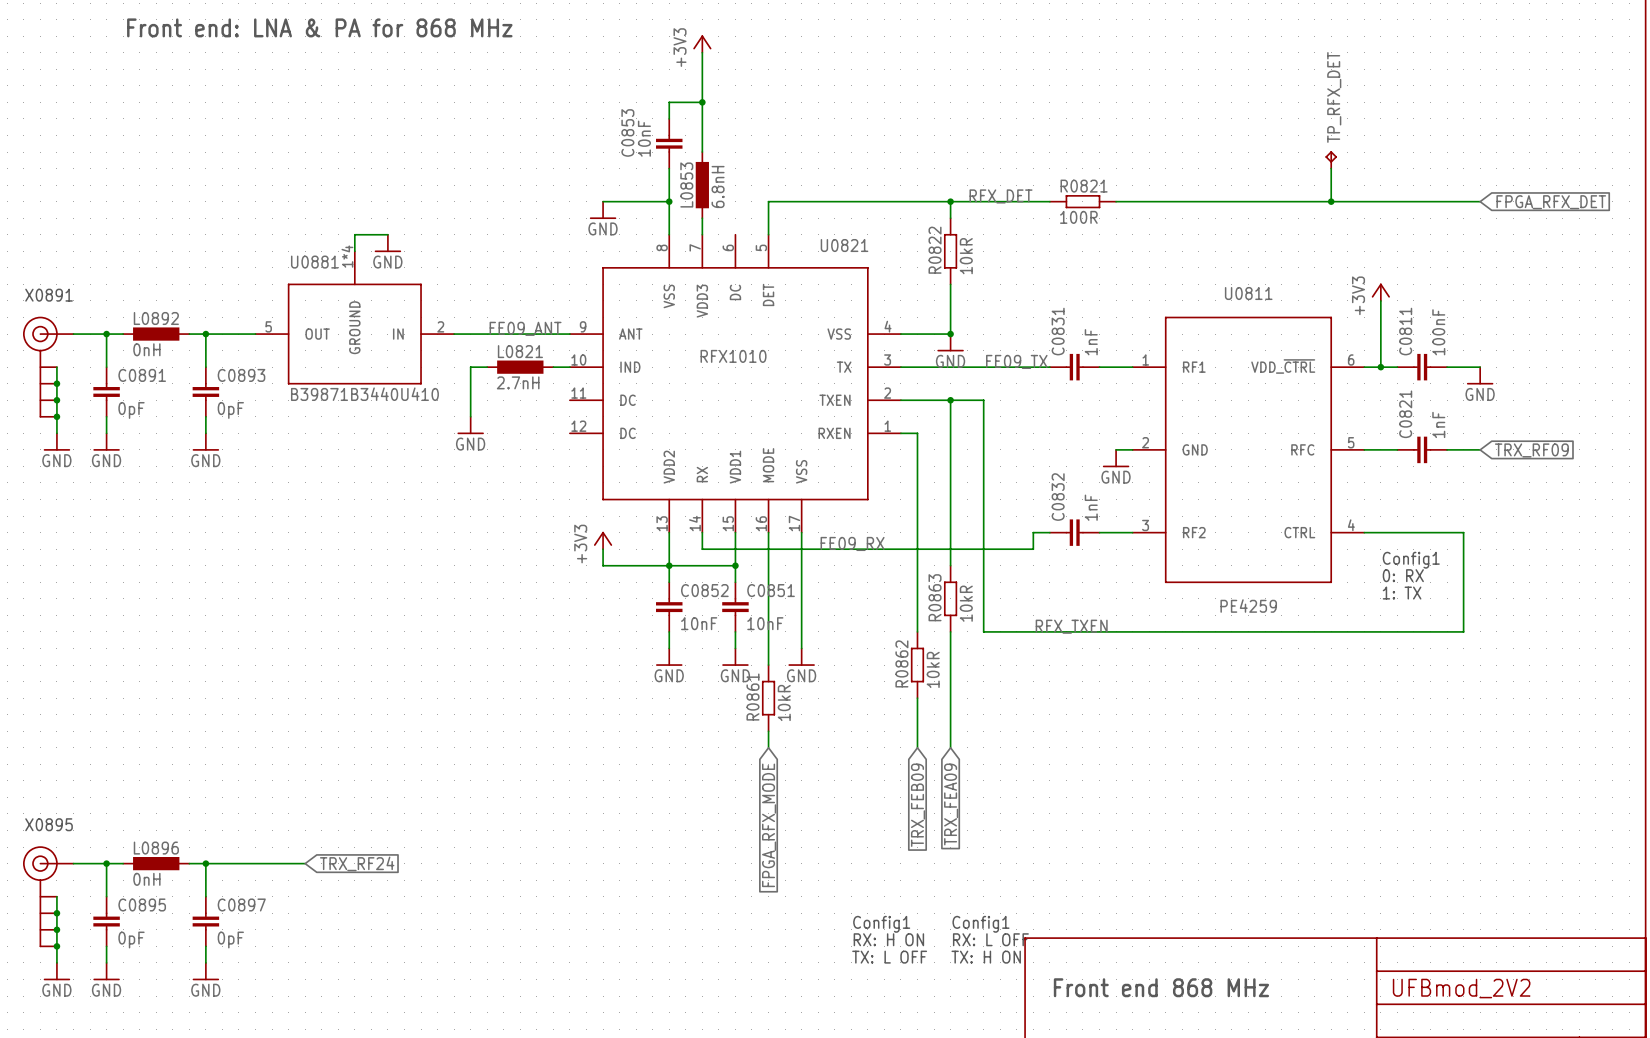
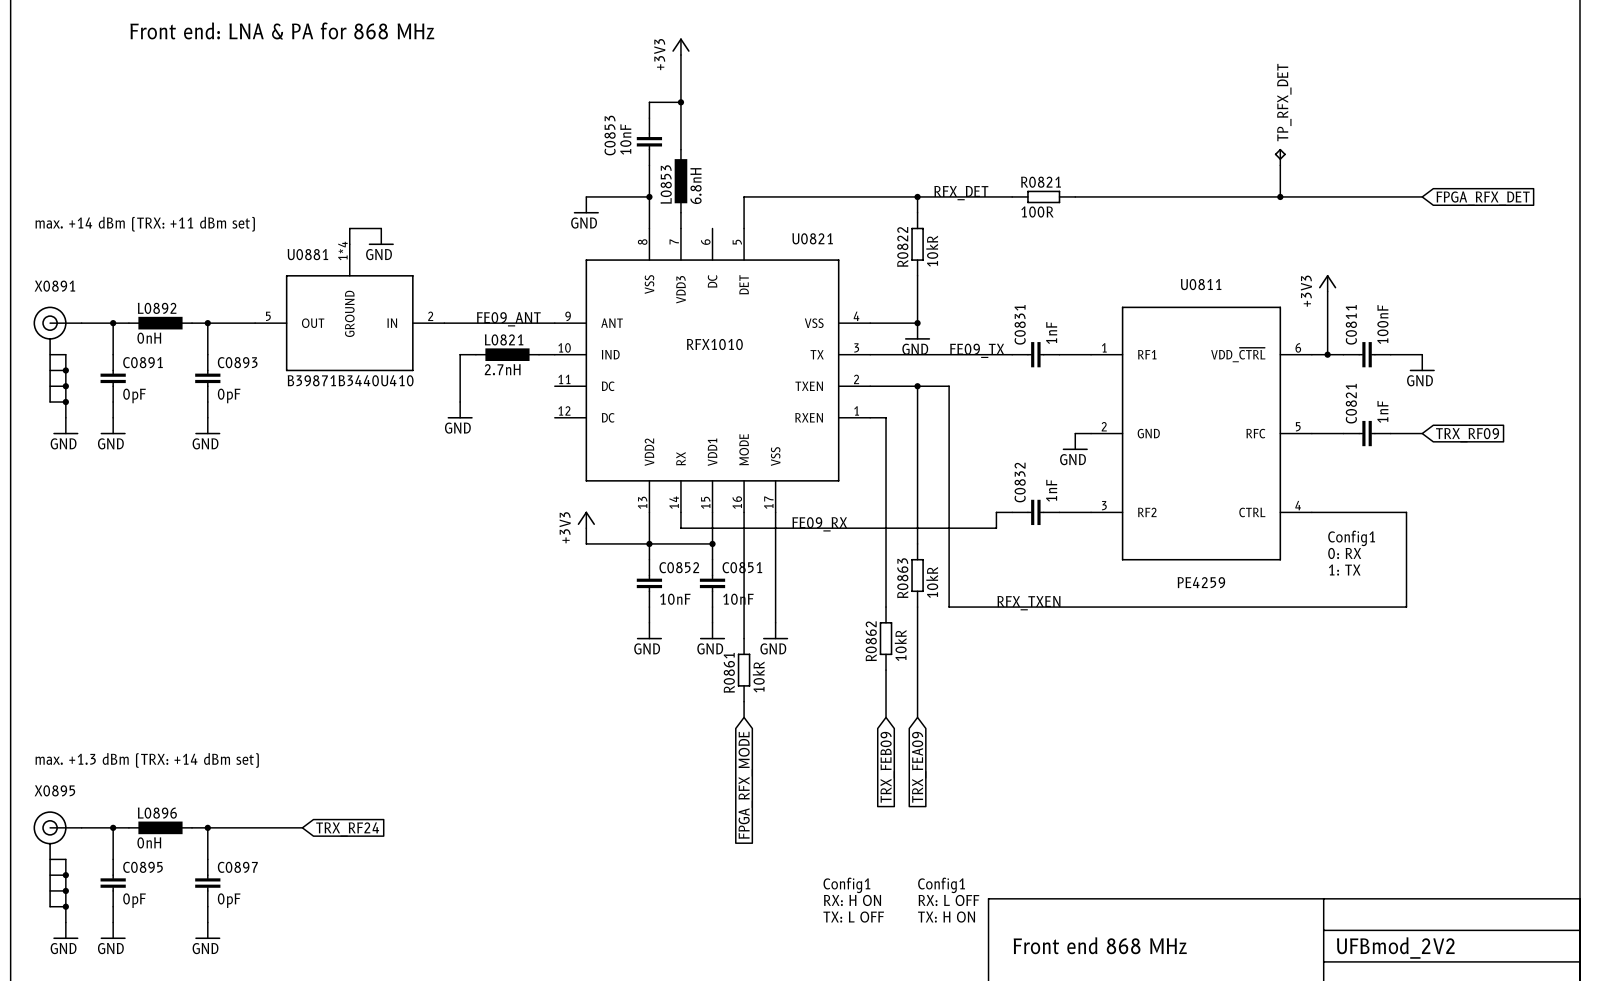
text: none -> max. +14 dBm (TRX: +11 dBm set) (145, 224)
text: none -> max. +1.3 dBm (TRX: +14 dBm set) (147, 760)

